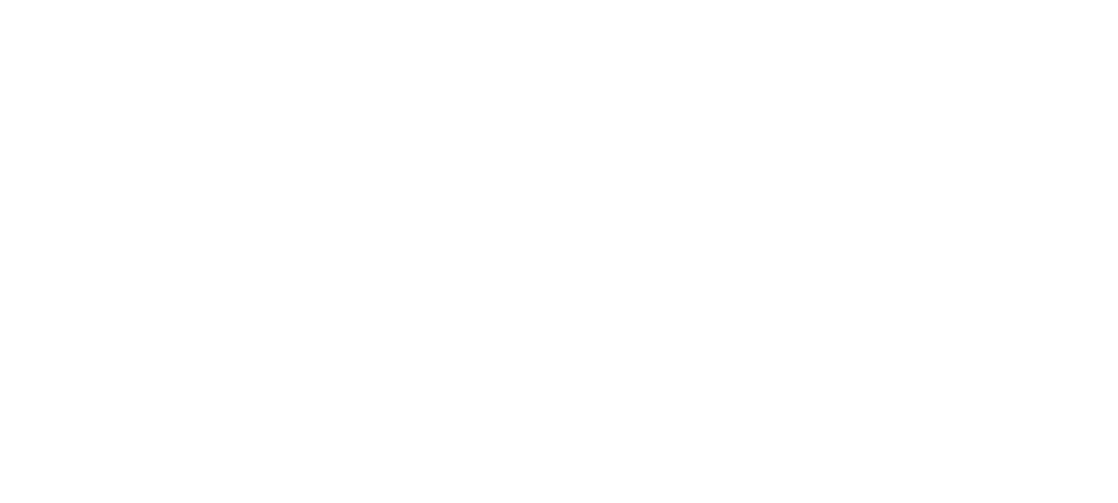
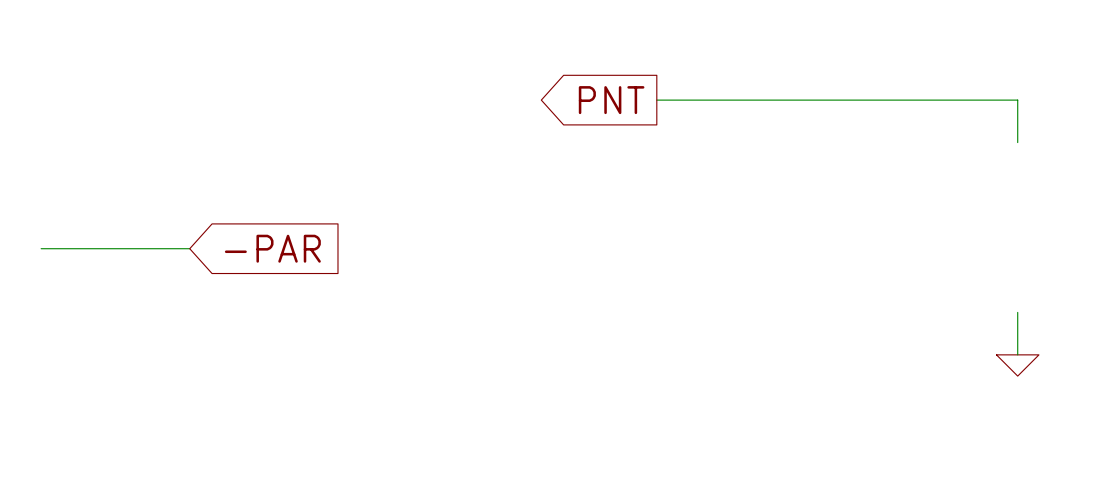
global label: none -> PNT (611, 100)
wire: none -> (656, 100) (1017, 100) (1017, 142)
wire: none -> (41, 248) (189, 248)
global label: none -> -PAR (272, 248)
wire: none -> (1017, 312) (1017, 354)
power symbol: none -> (1017, 365)

